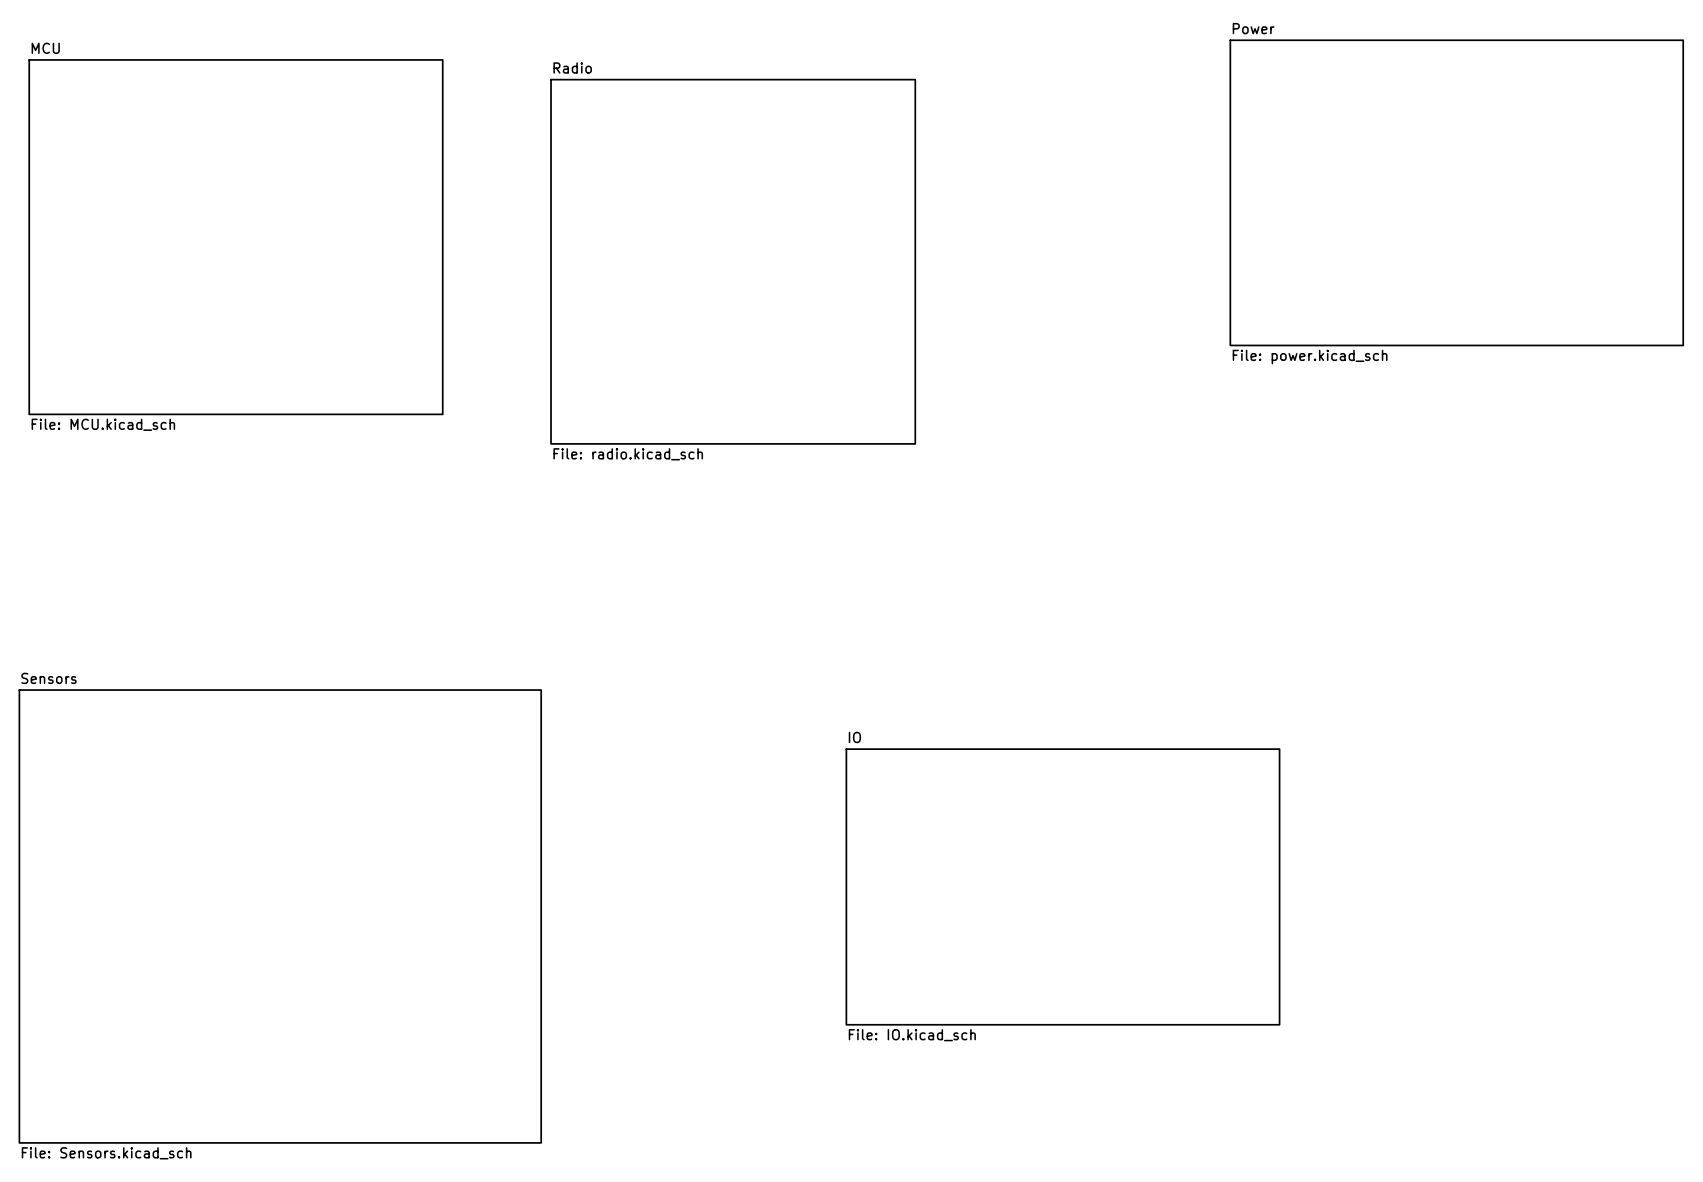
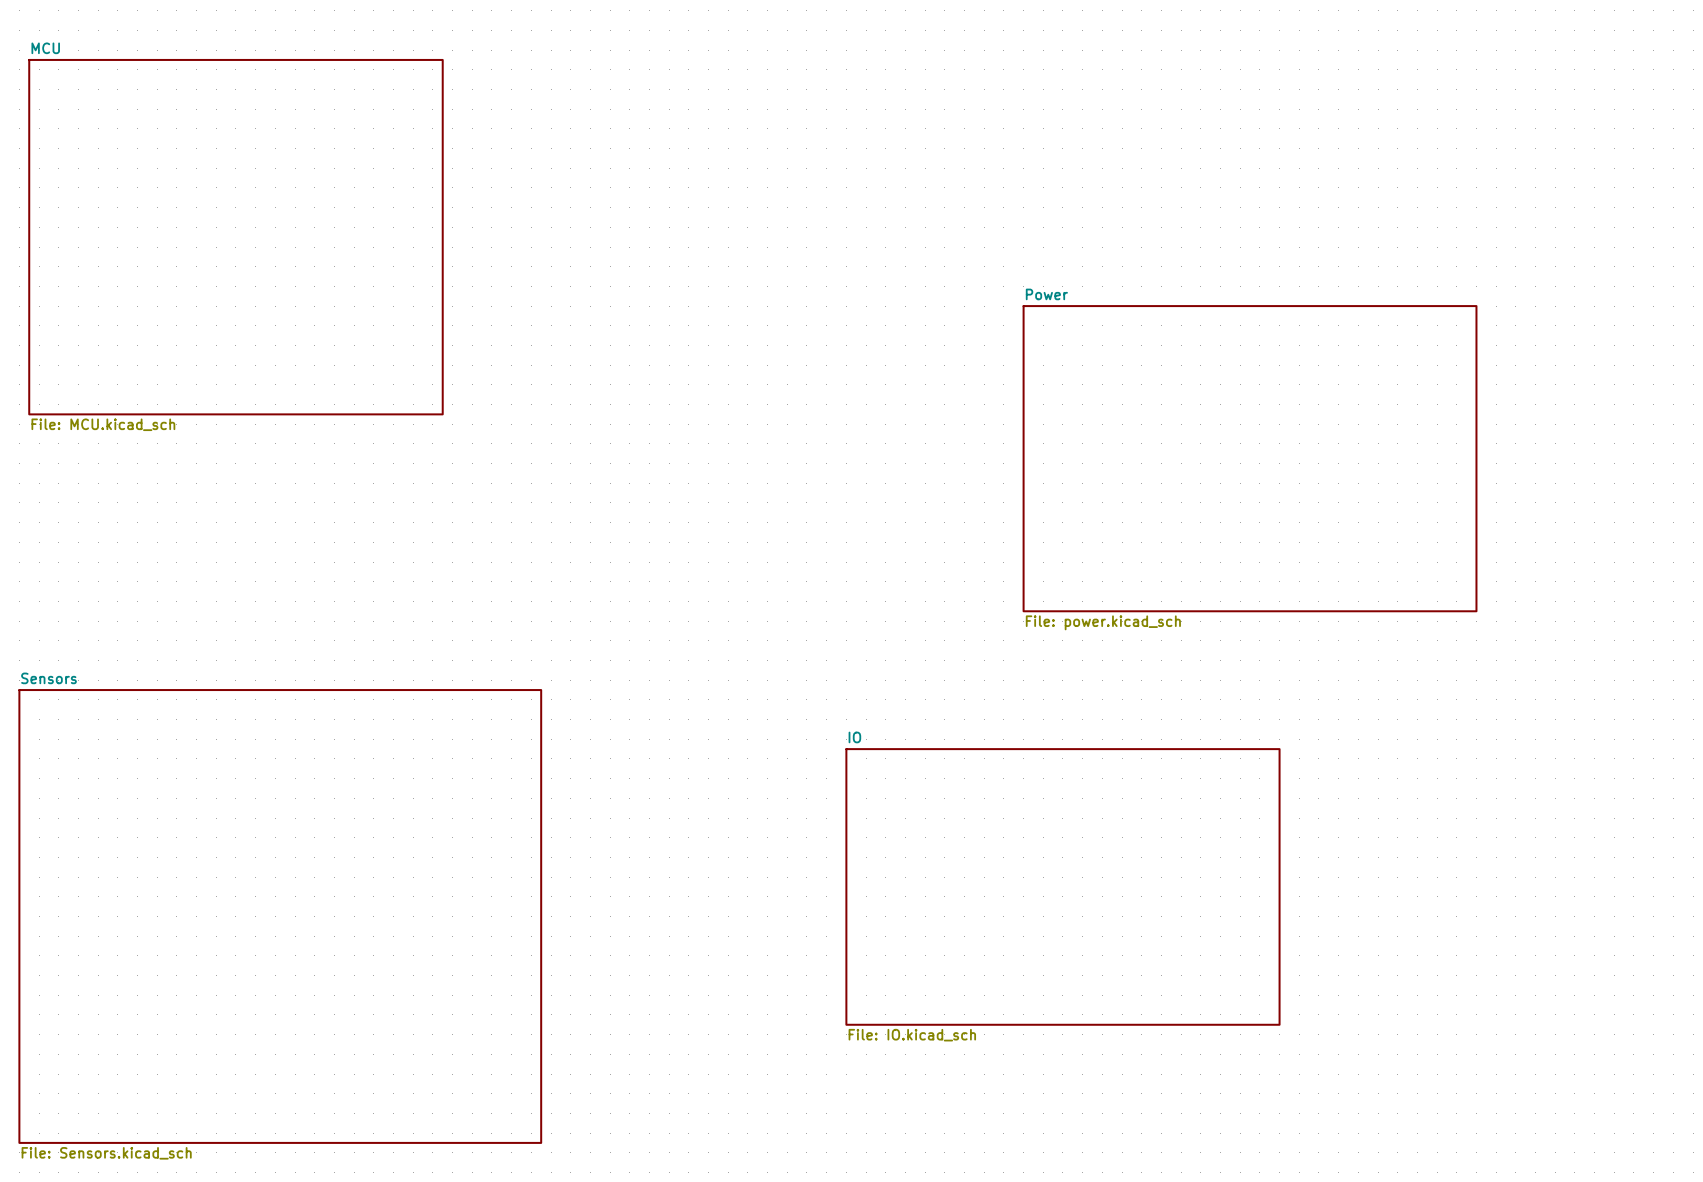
sheet Power: File: power.kicad_sch (1456, 192) -> none
sheet Radio: File: radio.kicad_sch (733, 261) -> none
sheet Power: none -> File: power.kicad_sch (1250, 458)

